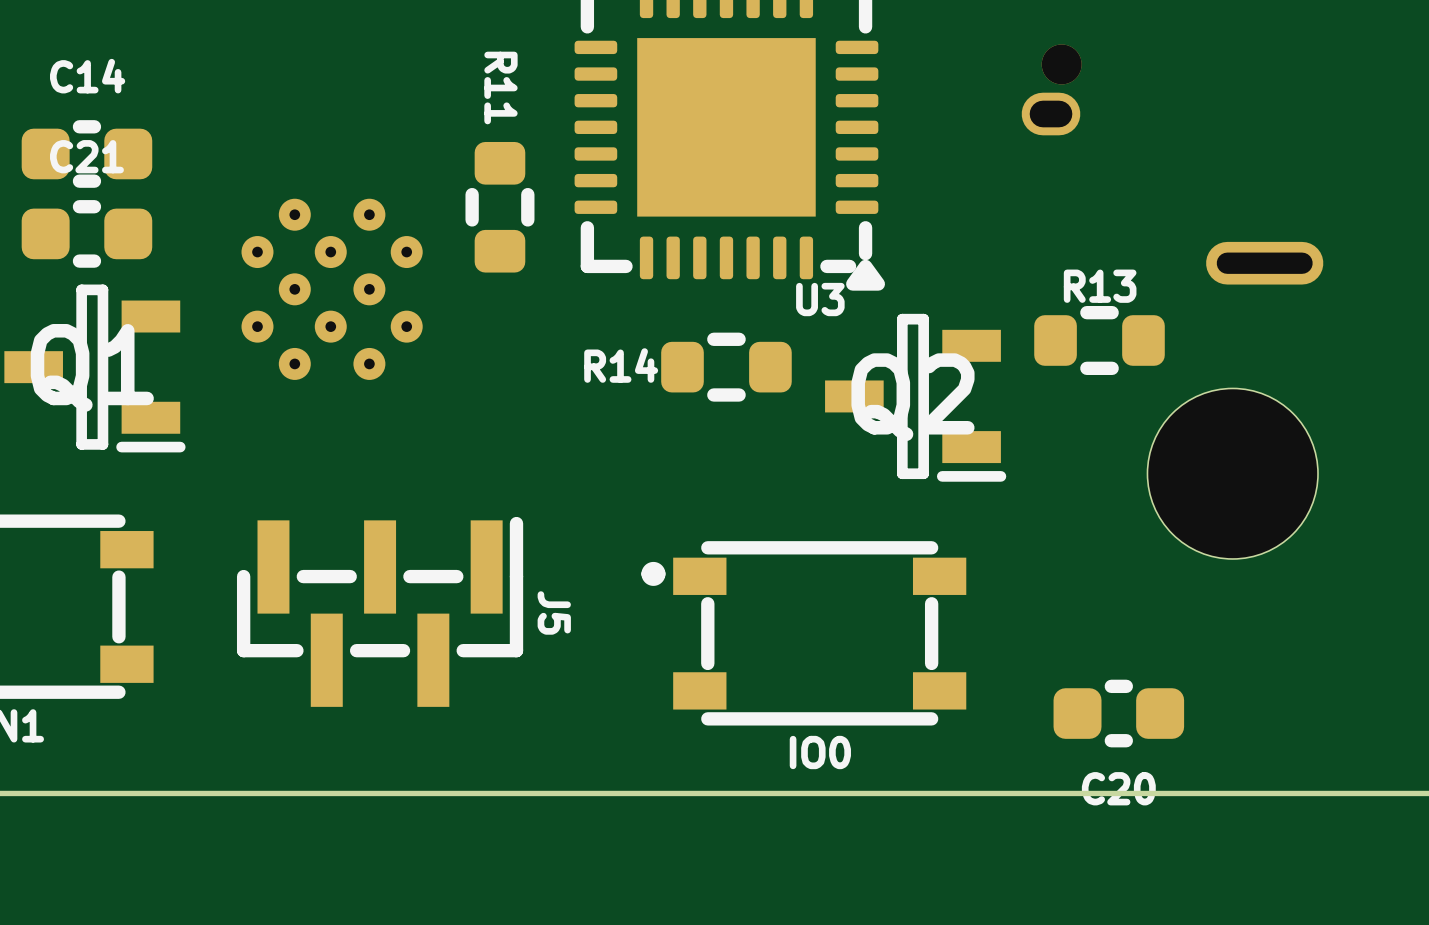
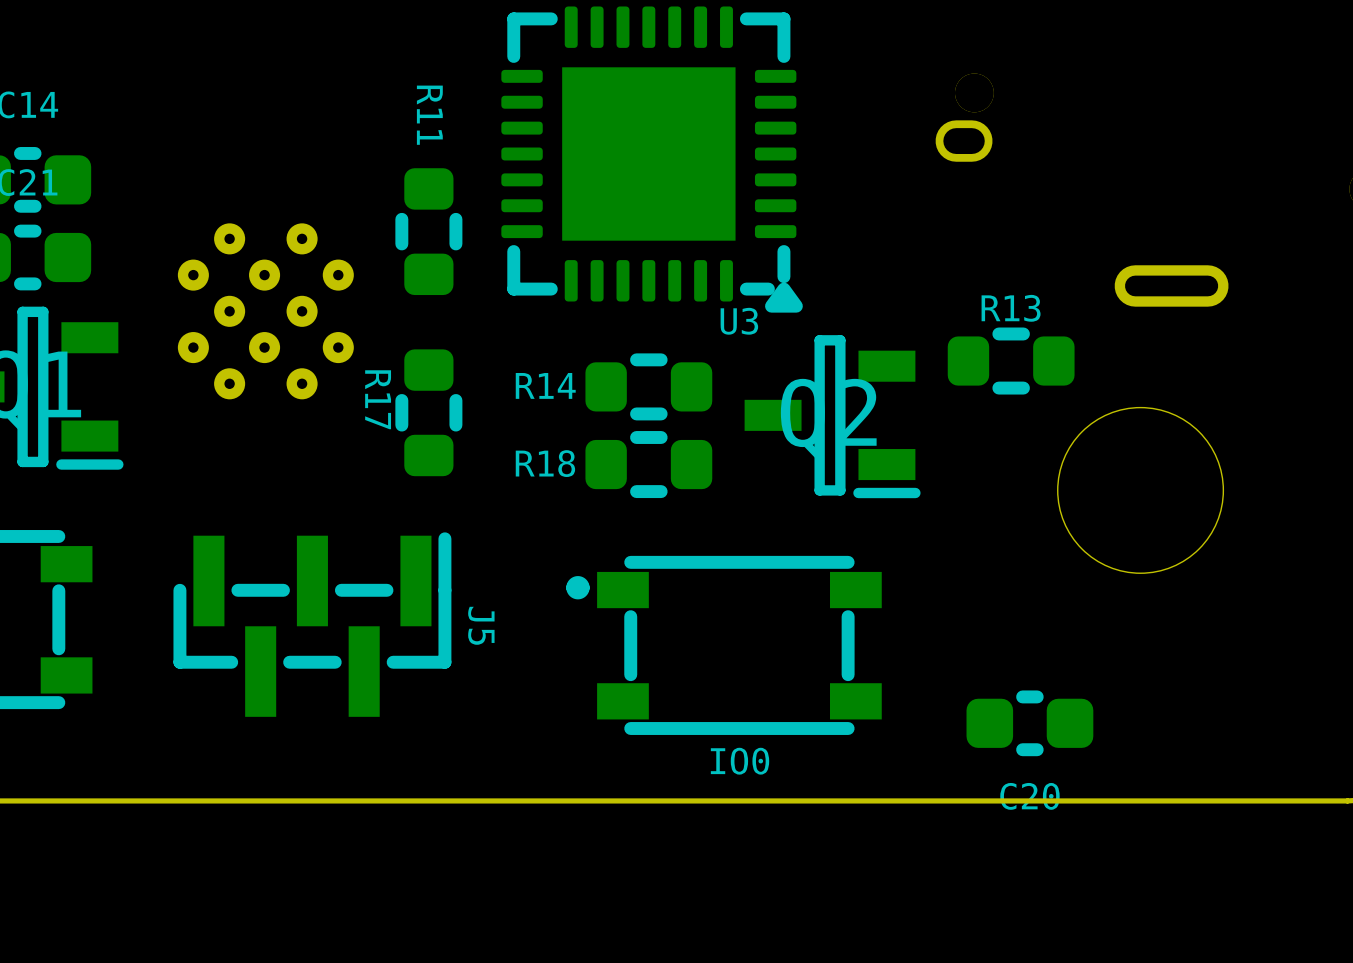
R17: none -> (428, 412)
R18: none -> (648, 464)

